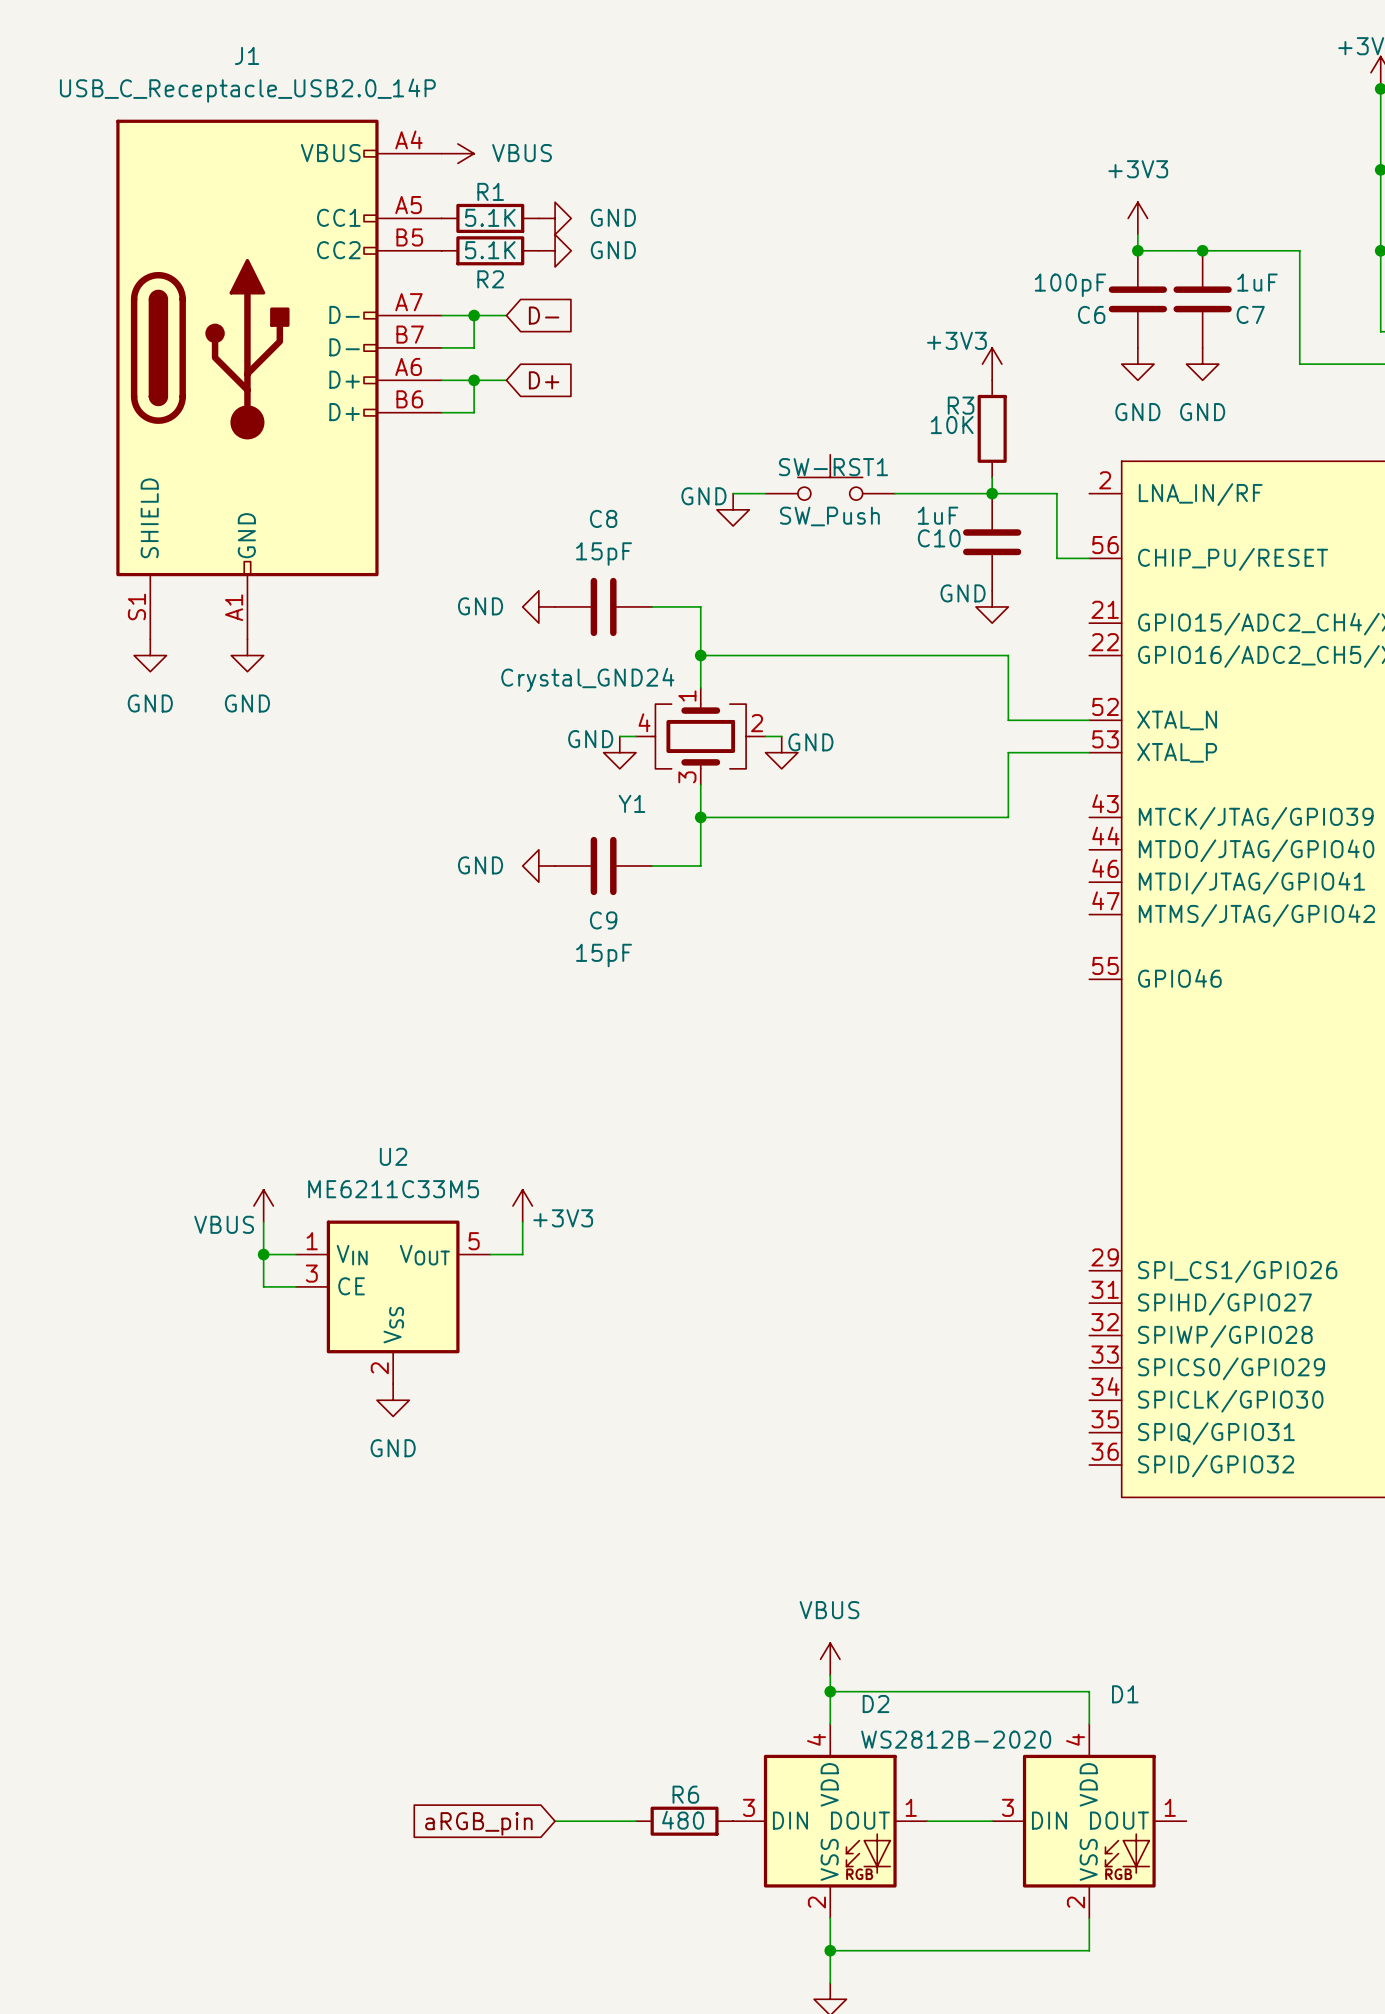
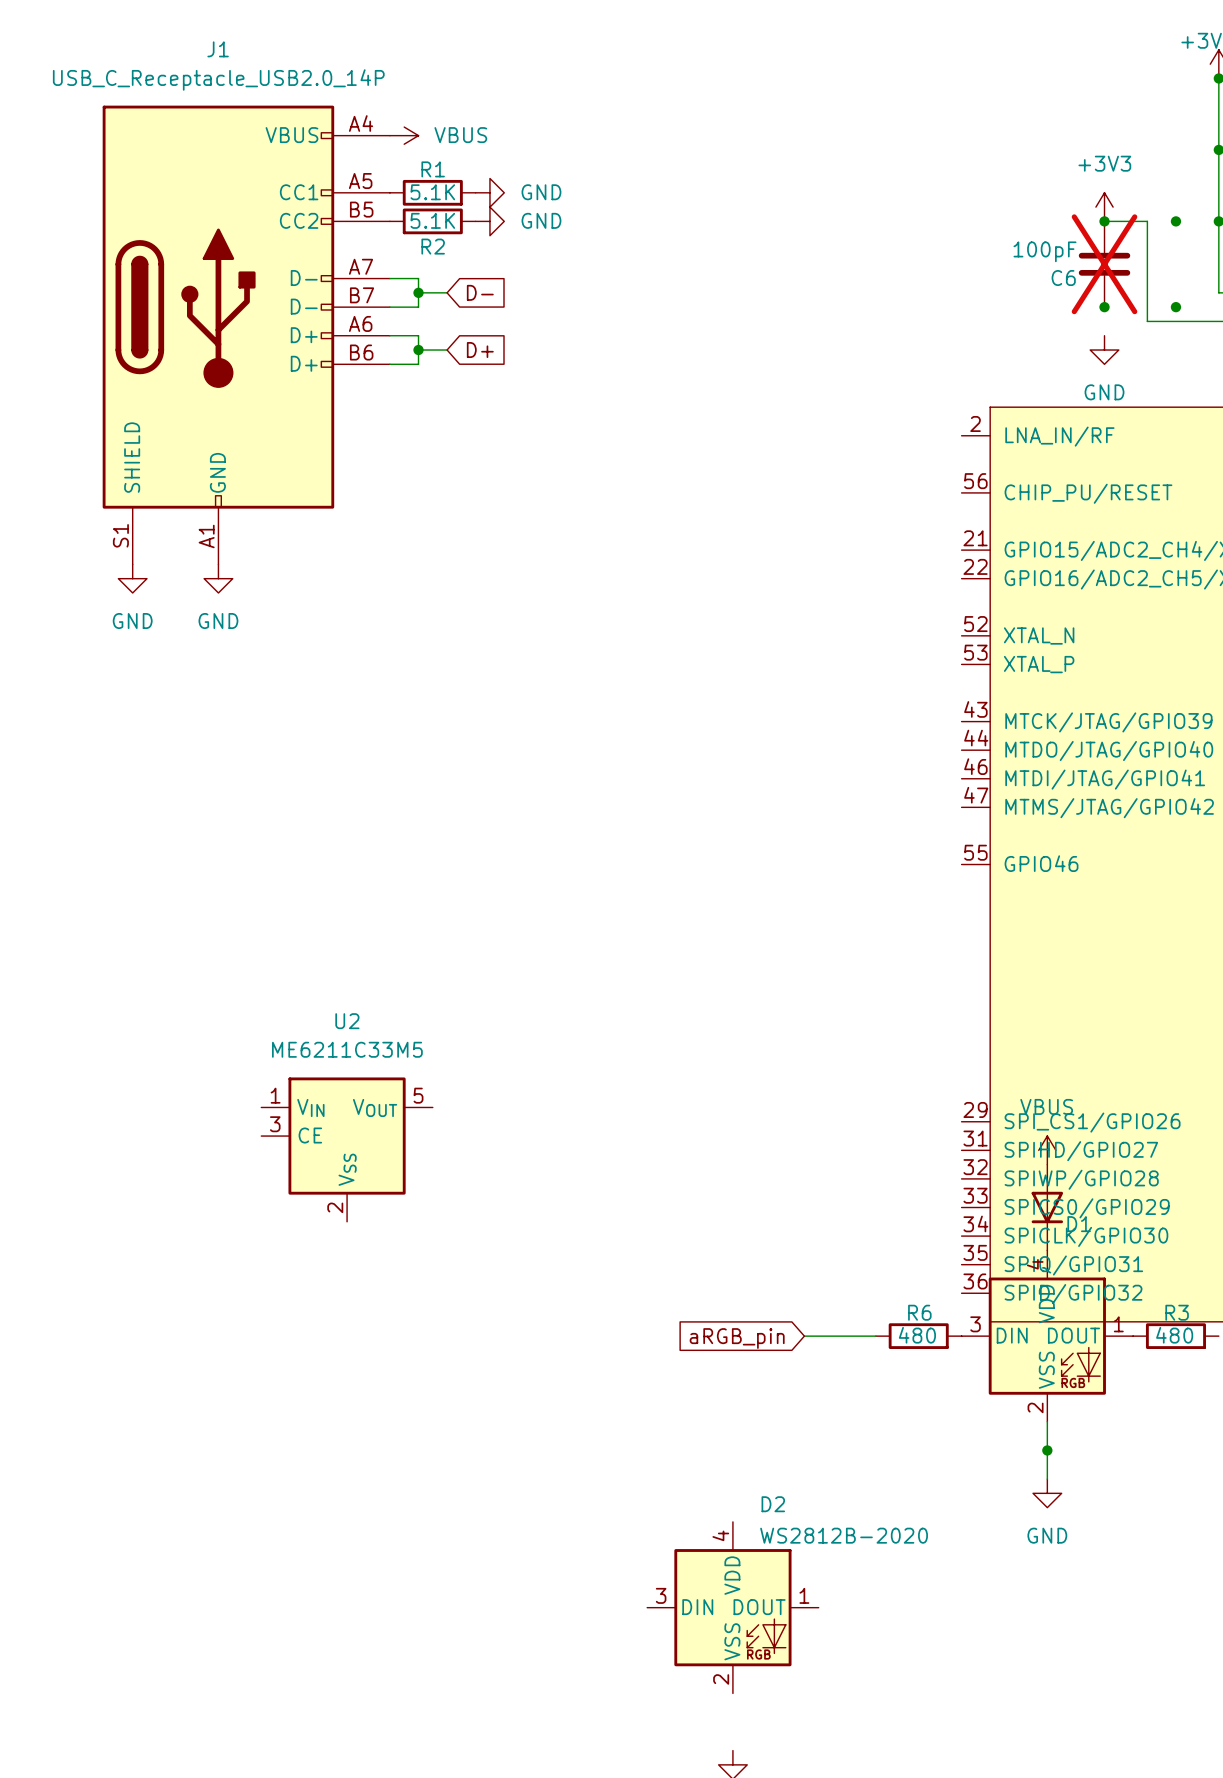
power symbol position: +3V3 (1137, 218) -> +3V3 (1104, 207)
wire: (1137, 234) (1137, 250) (1251, 250) -> none
junction: (1137, 250) -> none
junction position: (1202, 250) -> (1104, 221)
junction: none -> (1175, 221)
C6 position: (1137, 299) -> (1104, 264)
C7: 1uF (1202, 299) -> none
C6 do-not-place cross: none -> (1104, 264)
wire: (474, 315) (506, 315) -> (418, 292) (447, 292)
junction position: (474, 315) -> (418, 292)
global label position: D- (544, 315) -> D- (480, 292)
junction: none -> (1104, 307)
junction: none -> (1175, 307)
power symbol: +3V3 (992, 364) -> none
power symbol: GND (1137, 364) -> none
power symbol position: GND (1202, 364) -> GND (1104, 350)
wire: (474, 380) (506, 380) -> (418, 350) (447, 350)
junction position: (474, 380) -> (418, 350)
global label position: D+ (544, 380) -> D+ (480, 350)
R3 value: 10K (952, 425) -> 480 (1174, 1335)
R3 rotation: 0° (992, 428) -> 90° clockwise (1175, 1336)
R3 position: (992, 428) -> (1175, 1336)
SW-RST1: SW_Push (830, 477) -> none
wire: (992, 477) (992, 493) -> none
wire: (733, 493) (765, 493) -> none
wire: (895, 493) (1056, 493) (1056, 558) (1089, 558) -> none
junction: (992, 493) -> none
power symbol: GND (733, 509) -> none
C10: 1uF (992, 542) -> none
power symbol: GND (538, 606) -> none
C8: 15pF (603, 606) -> none
wire: (652, 606) (700, 606) (700, 687) -> none
power symbol: GND (992, 606) -> none
wire: (700, 655) (1008, 655) (1008, 720) (1089, 720) -> none
junction: (700, 655) -> none
wire: (619, 736) (635, 736) -> none
Y1: Crystal_GND24 (700, 736) -> none
wire: (765, 736) (781, 736) -> none
power symbol: GND (619, 752) -> none
power symbol: GND (781, 752) -> none
wire: (1089, 752) (1008, 752) (1008, 817) (700, 817) -> none
wire: (700, 785) (700, 866) (652, 866) -> none
junction: (700, 817) -> none
power symbol: GND (538, 866) -> none
C9: 15pF (603, 866) -> none
power symbol: VBUS (263, 1205) -> none
power symbol: +3V3 (522, 1205) -> none
wire: (263, 1222) (263, 1286) (296, 1286) -> none
wire: (522, 1222) (522, 1254) (490, 1254) -> none
wire: (263, 1254) (296, 1254) -> none
junction: (263, 1254) -> none
power symbol: none -> VBUS (1047, 1150)
part: none -> (1047, 1207)
power symbol: GND (393, 1400) -> none
wire: none -> (804, 1336) (875, 1336)
global label: none -> aRGB_pin (737, 1338)
wire: none -> (1047, 1421) (1047, 1479)
junction: none -> (1047, 1450)
power symbol: VBUS (830, 1659) -> none
wire: (830, 1675) (830, 1724) -> none
wire: (830, 1691) (1089, 1691) (1089, 1724) -> none
junction: (830, 1691) -> none
power symbol: none -> GND (1047, 1493)
wire: (555, 1821) (635, 1821) -> none
R6 position: (684, 1821) -> (918, 1336)
wire: (927, 1821) (992, 1821) -> none
D1 position: (1089, 1821) -> (1047, 1336)
global label: aRGB_pin (478, 1823) -> none
wire: (830, 1918) (830, 1983) -> none
wire: (1089, 1918) (1089, 1950) (830, 1950) -> none
junction: (830, 1950) -> none

